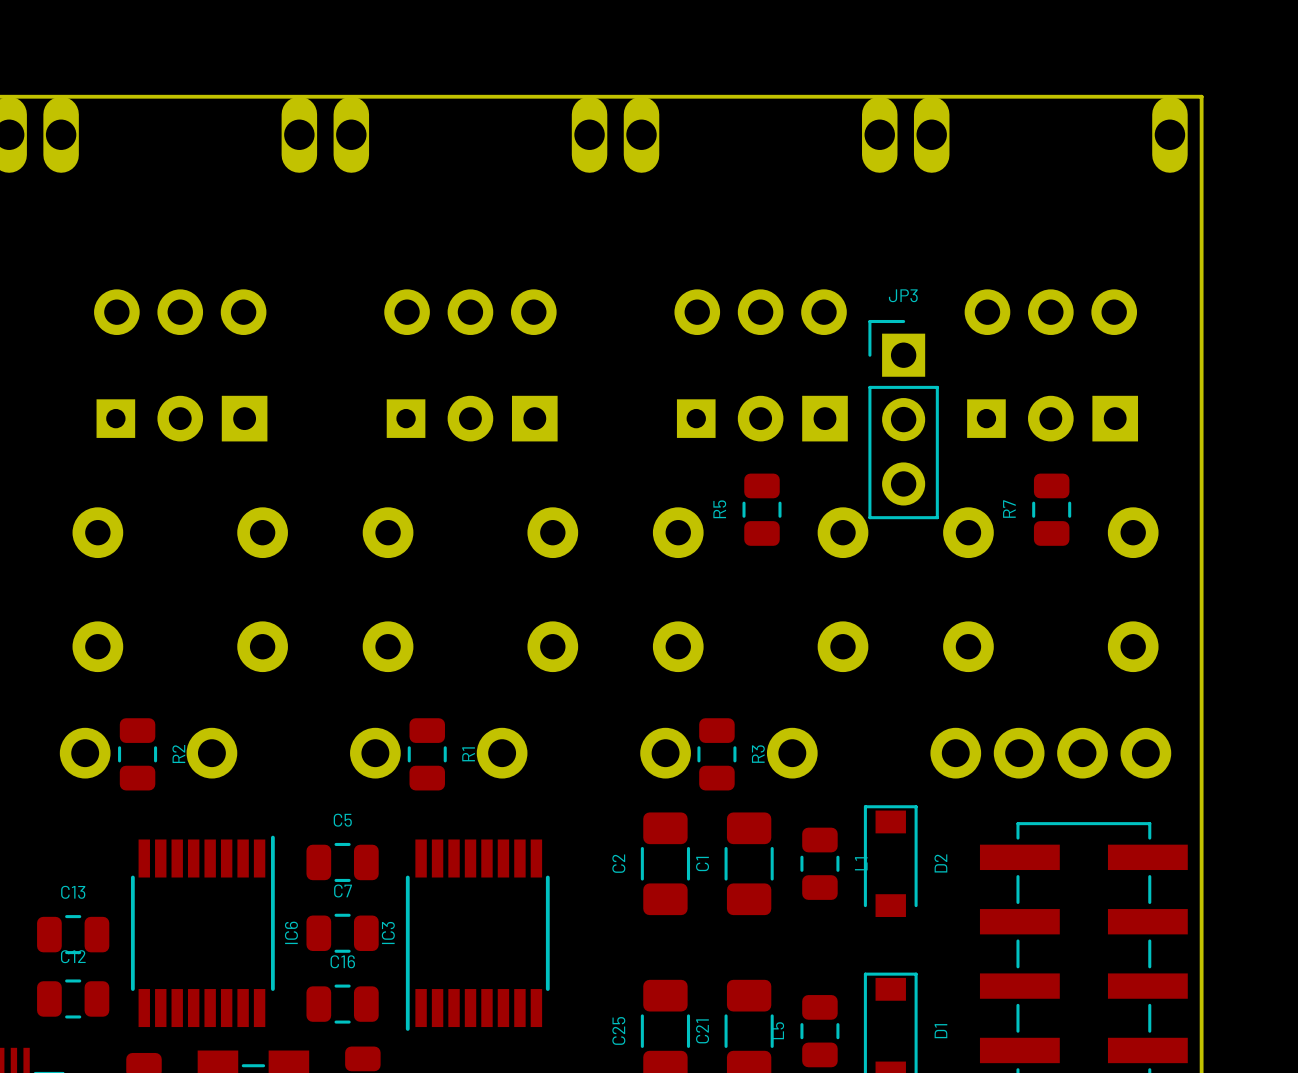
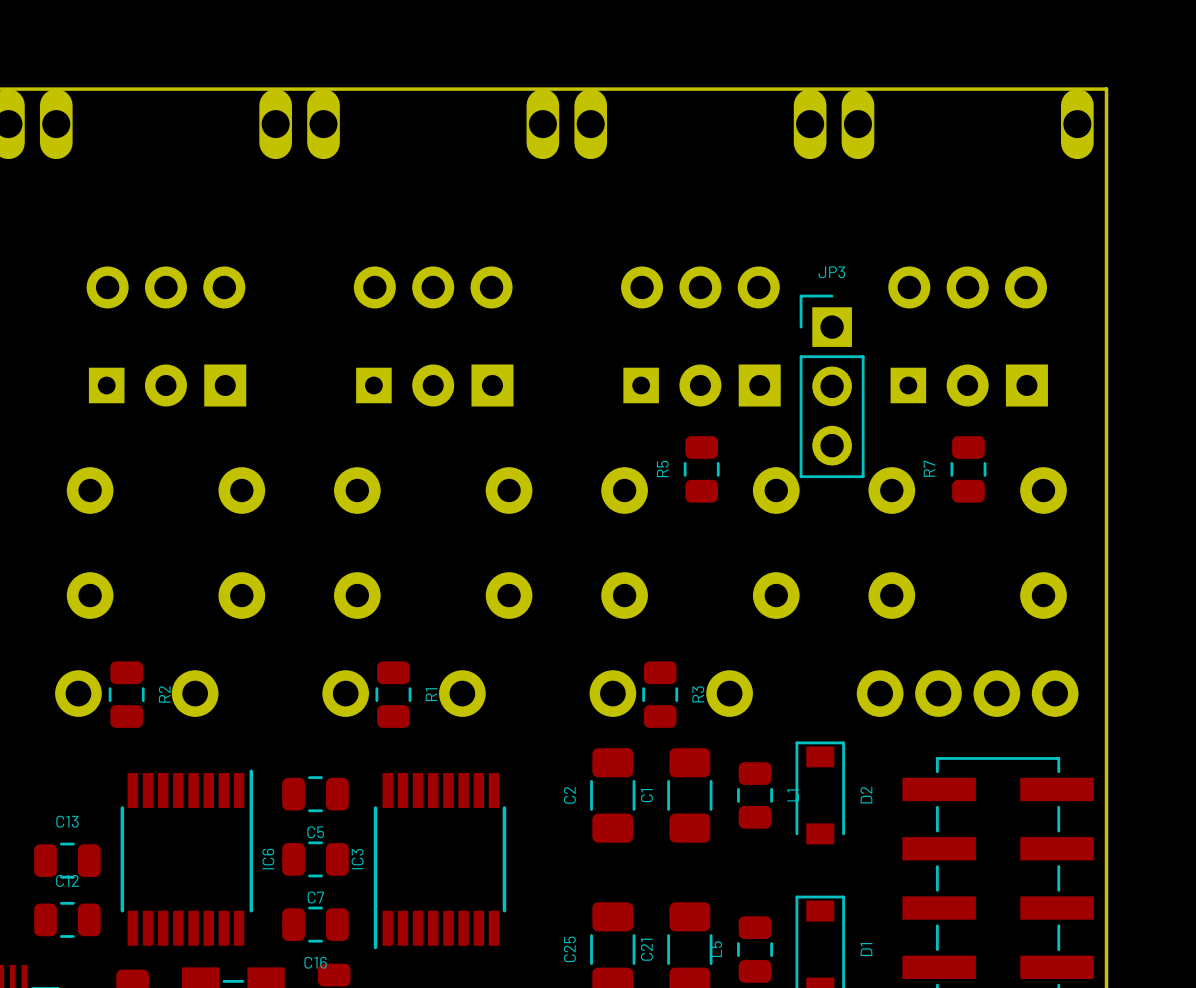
C5 name position: C5 (342, 820) -> C5 (315, 832)
C7 name position: C7 (343, 890) -> C7 (315, 897)
C16 name position: C16 (342, 961) -> C16 (315, 962)

